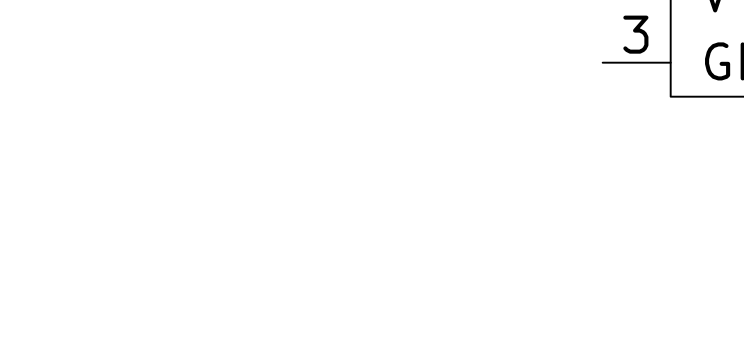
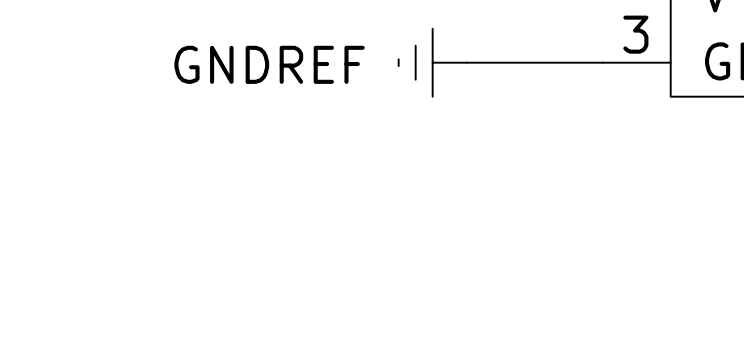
power symbol: none -> GNDREF (432, 62)
wire: none -> (466, 62) (602, 62)

